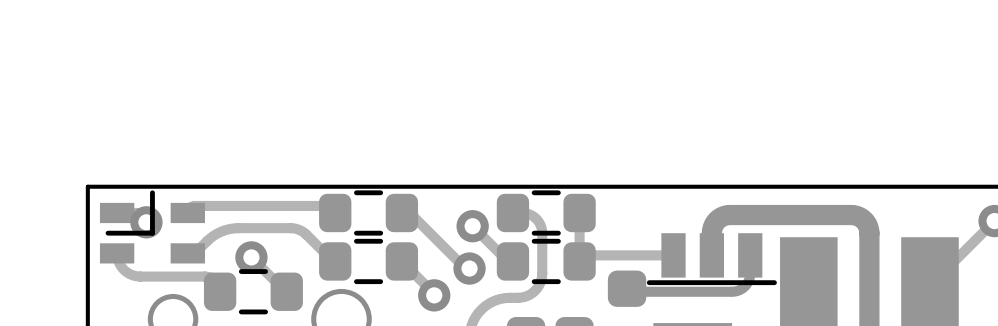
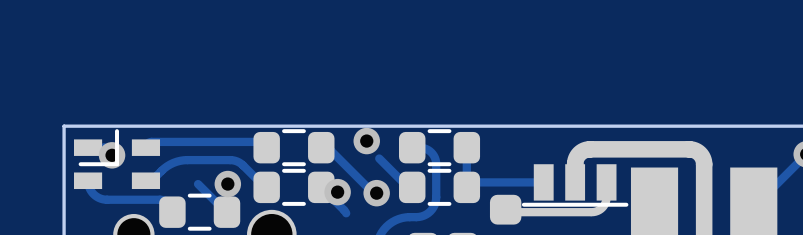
via position: (472, 226) -> (366, 141)
via position: (251, 257) -> (227, 184)
via position: (434, 295) -> (337, 192)

